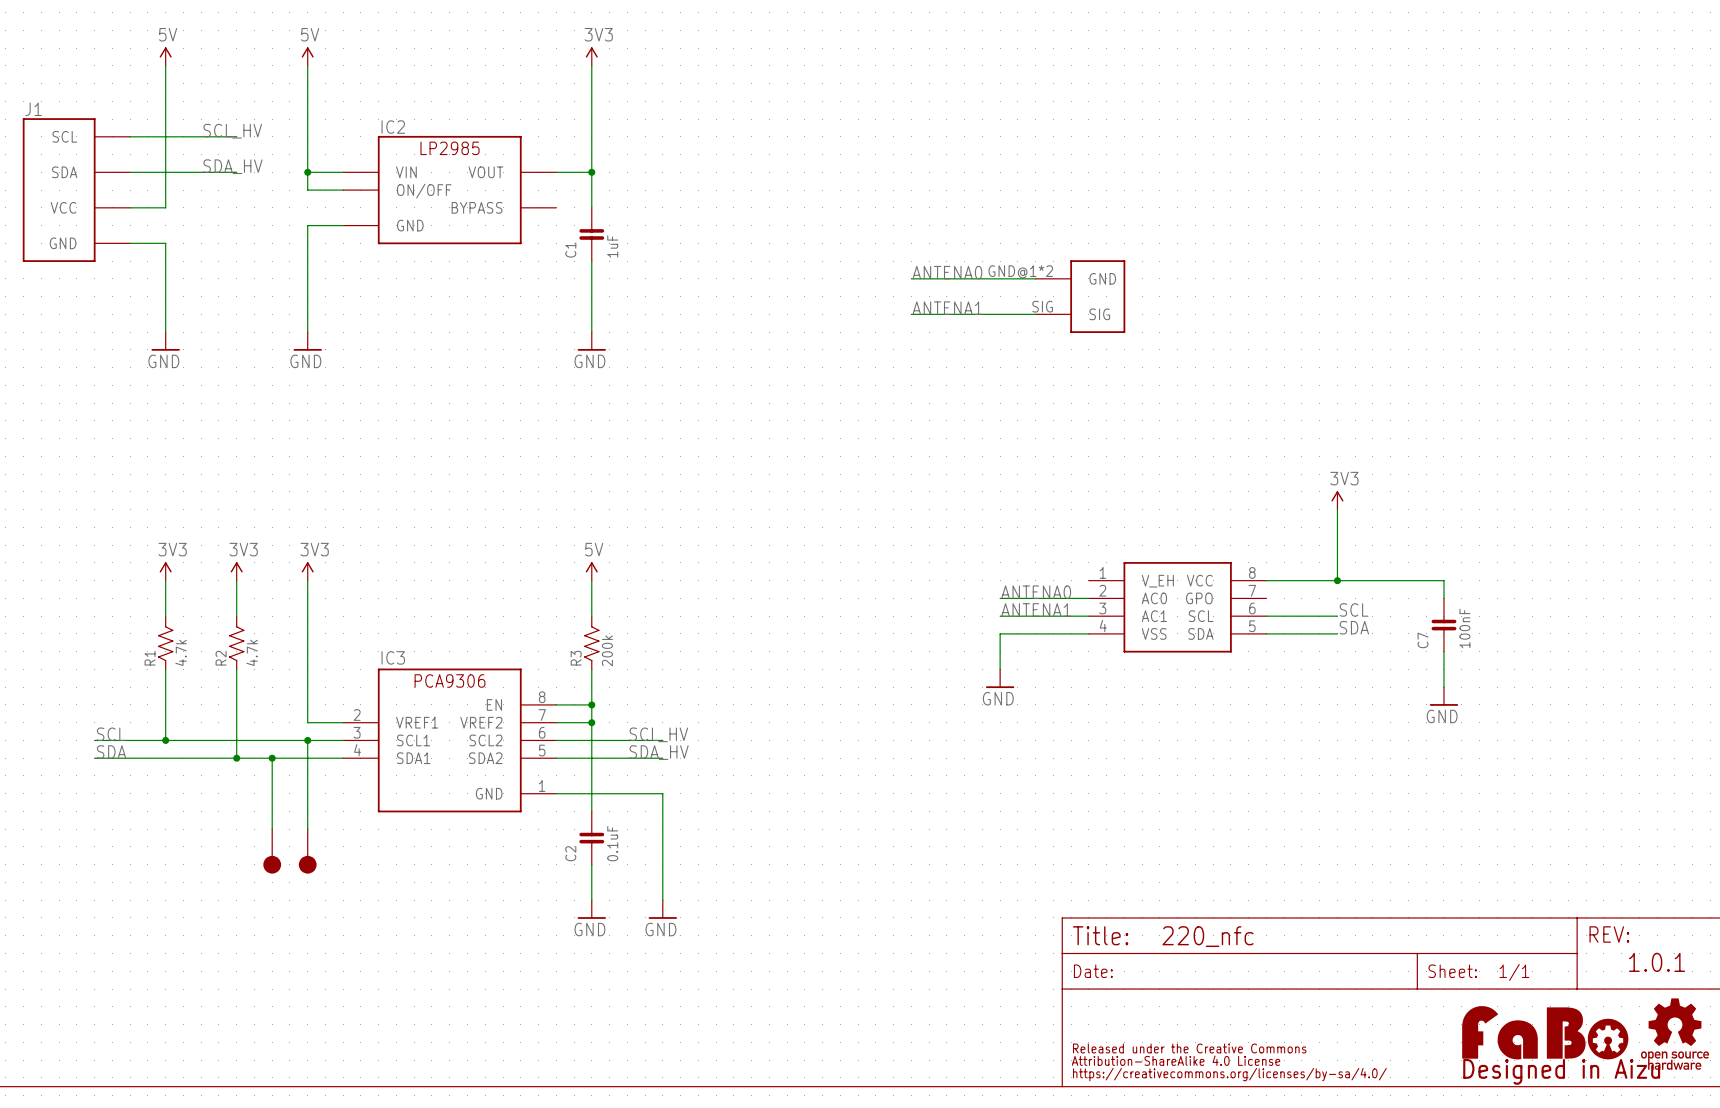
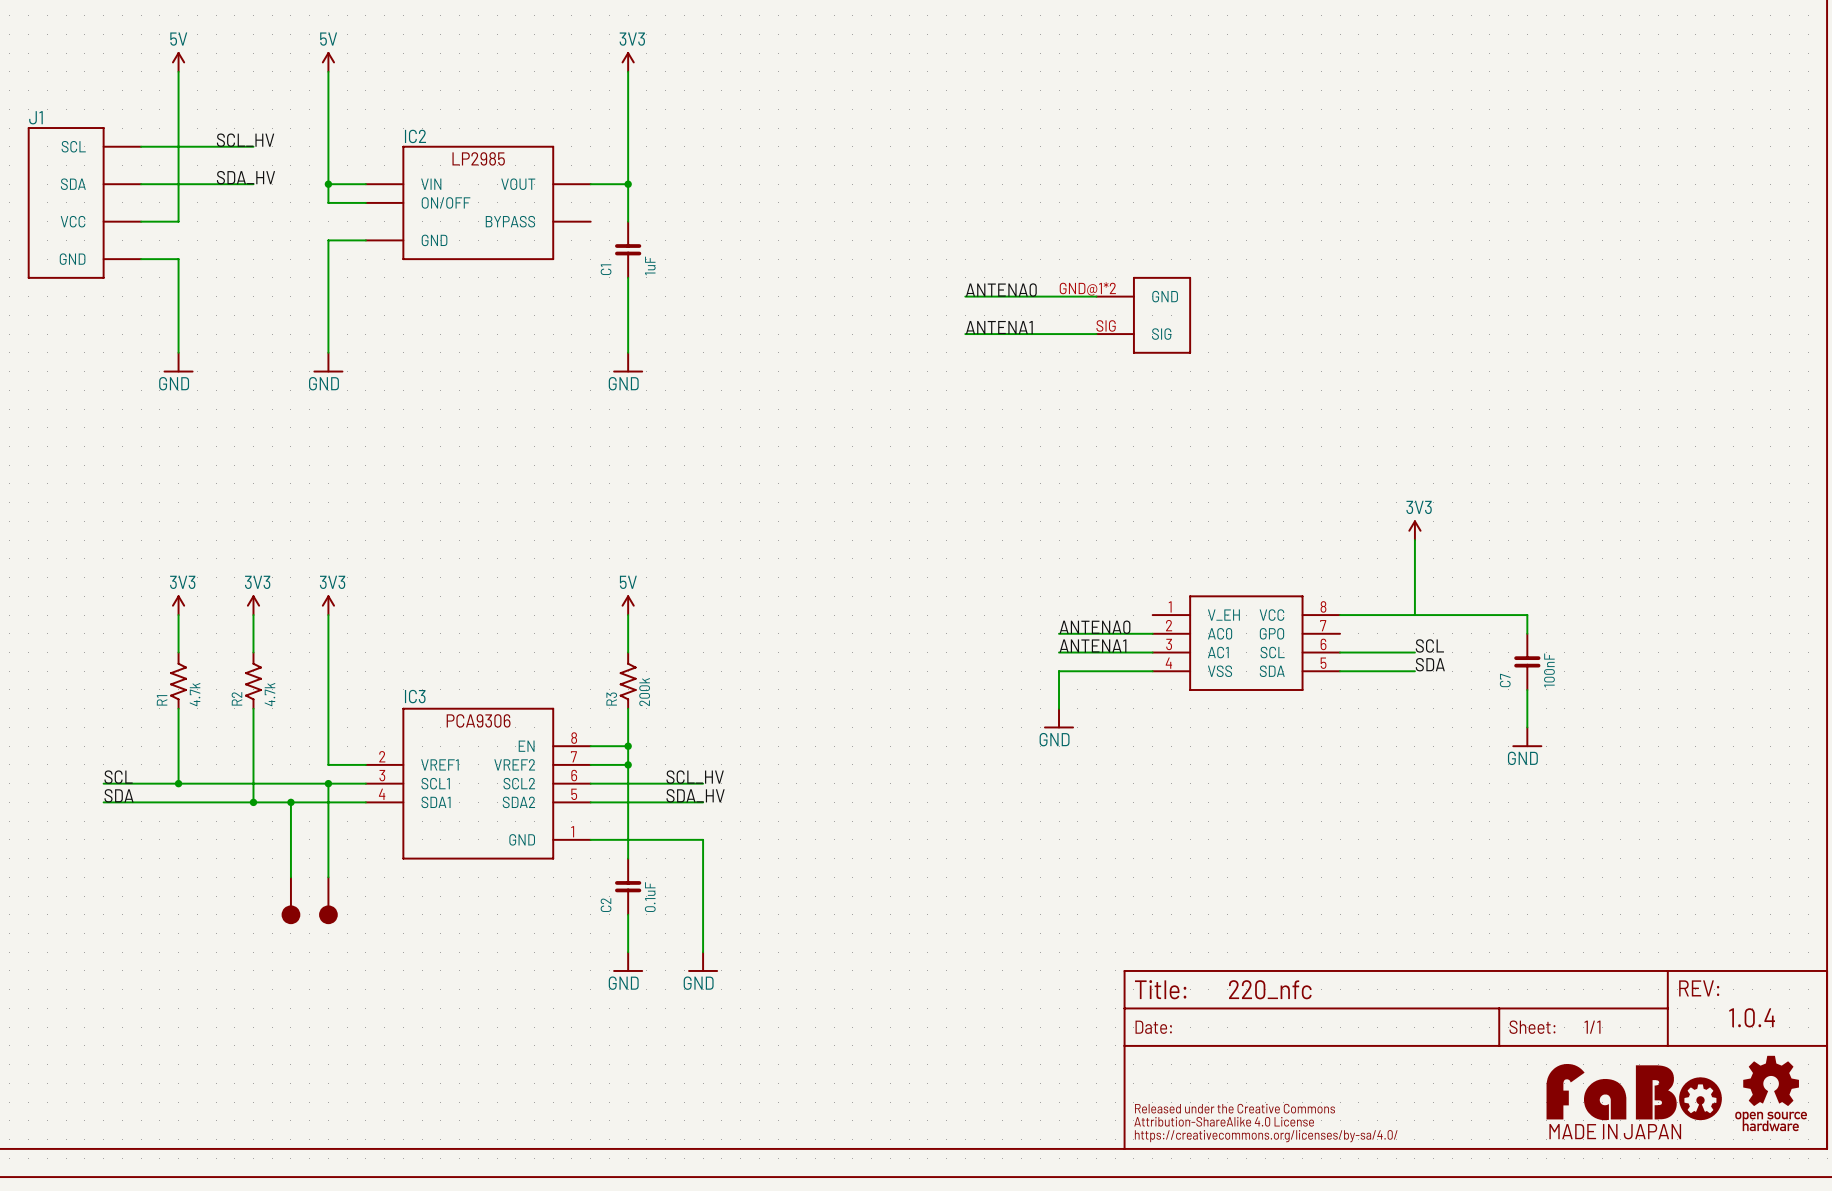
junction: (1337, 580) -> none
text: 1.0.1 (1657, 962) -> 1.0.4 (1752, 1017)
part text: none -> MADE IN JAPAN (1615, 1131)
part text: Designed in Aizu (1561, 1071) -> none

